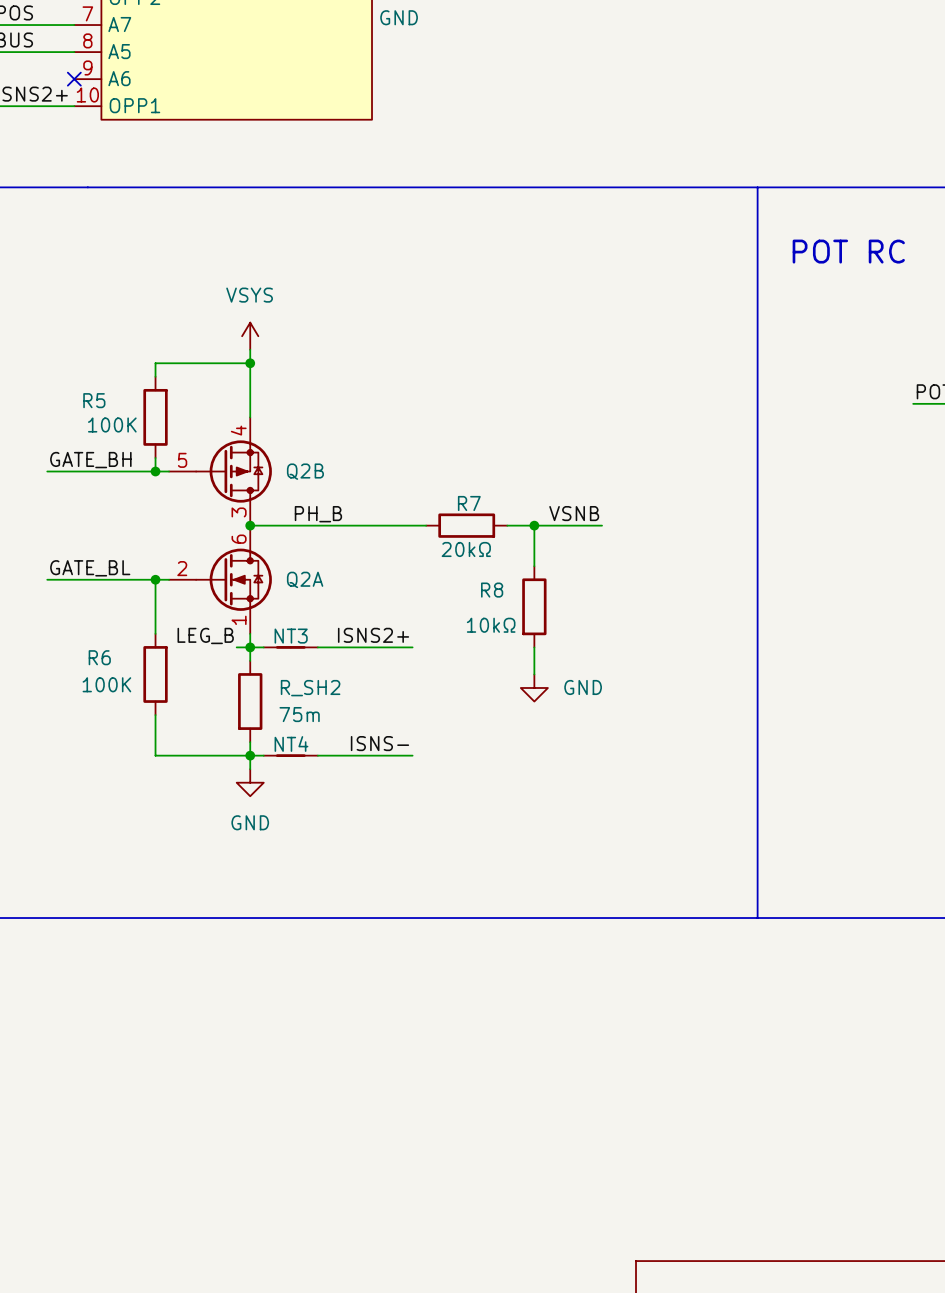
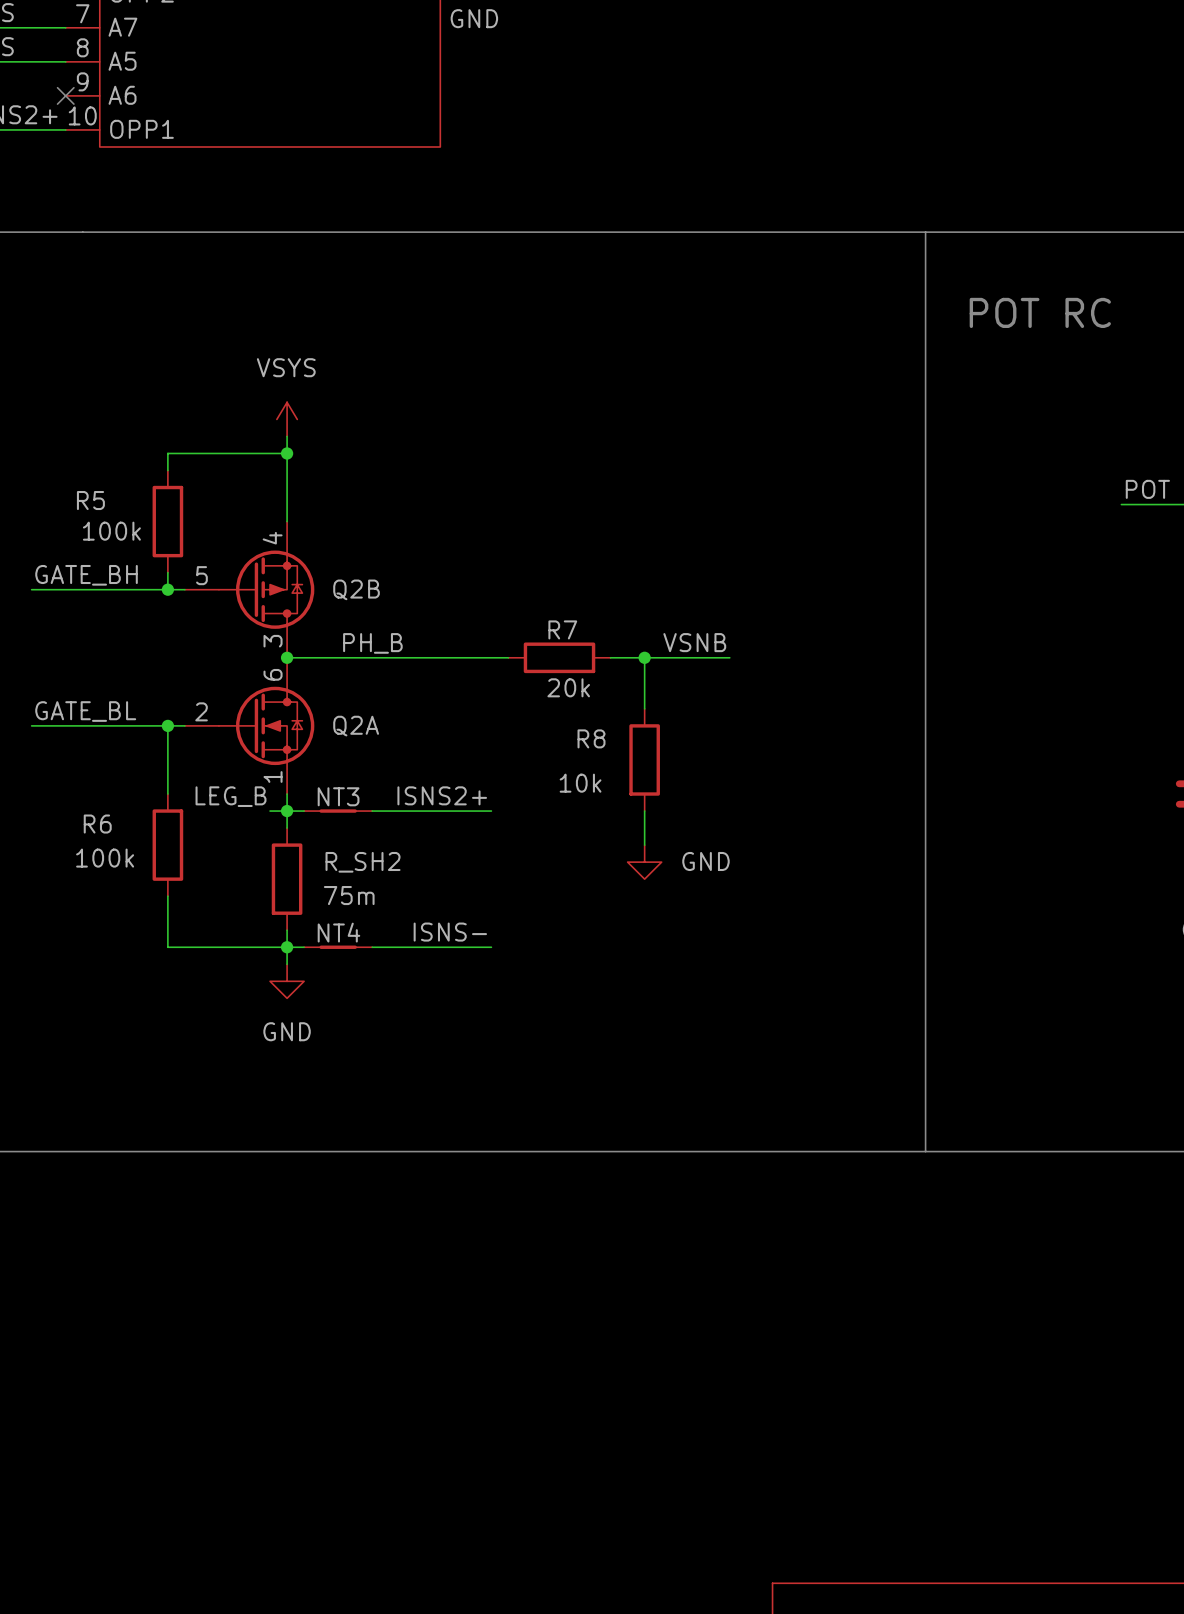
R5 value: 100K (112, 425) -> 100k (111, 531)
R7 value: 20kΩ (466, 549) -> 20k (568, 687)
R8 value: 10kΩ (491, 625) -> 10k (580, 783)
R6 value: 100K (106, 684) -> 100k (105, 858)

